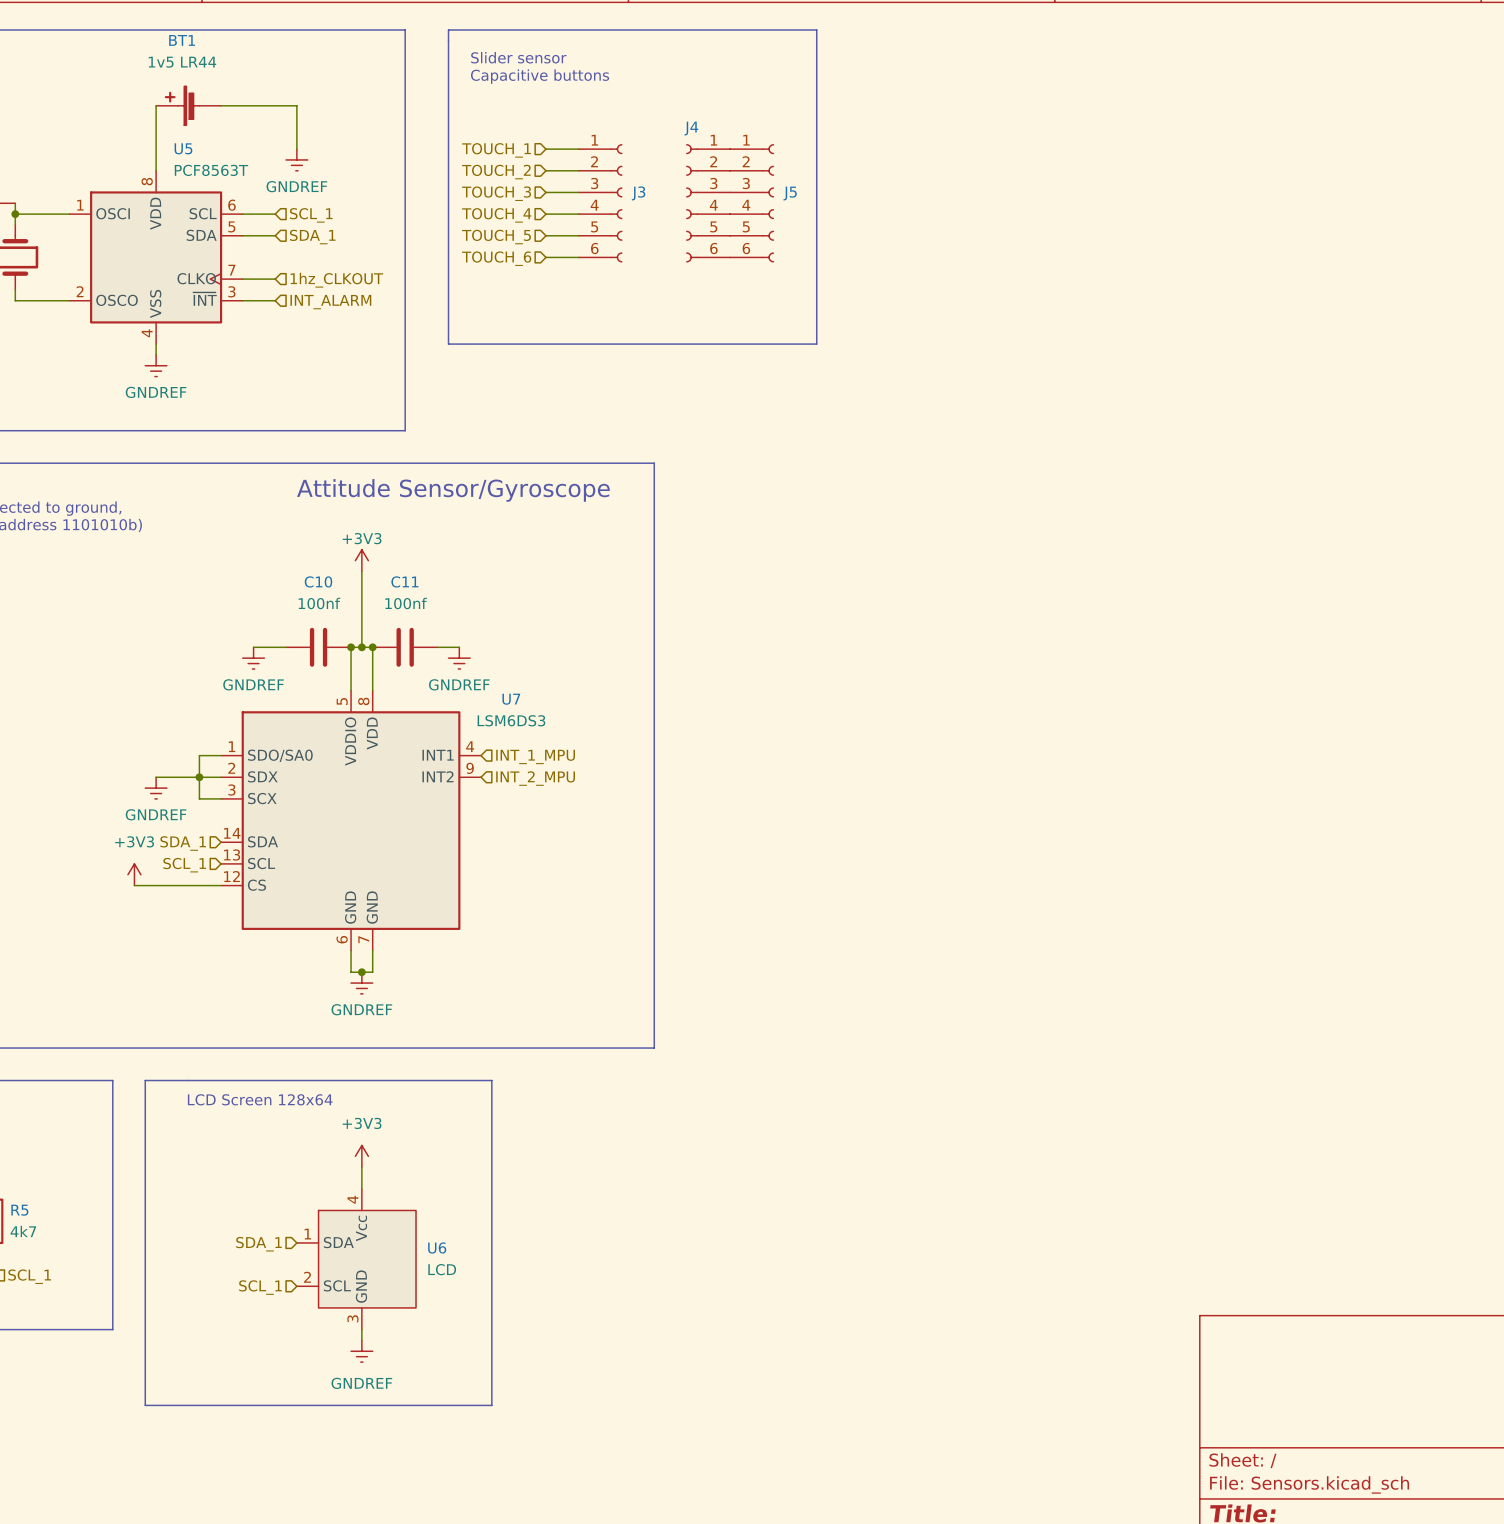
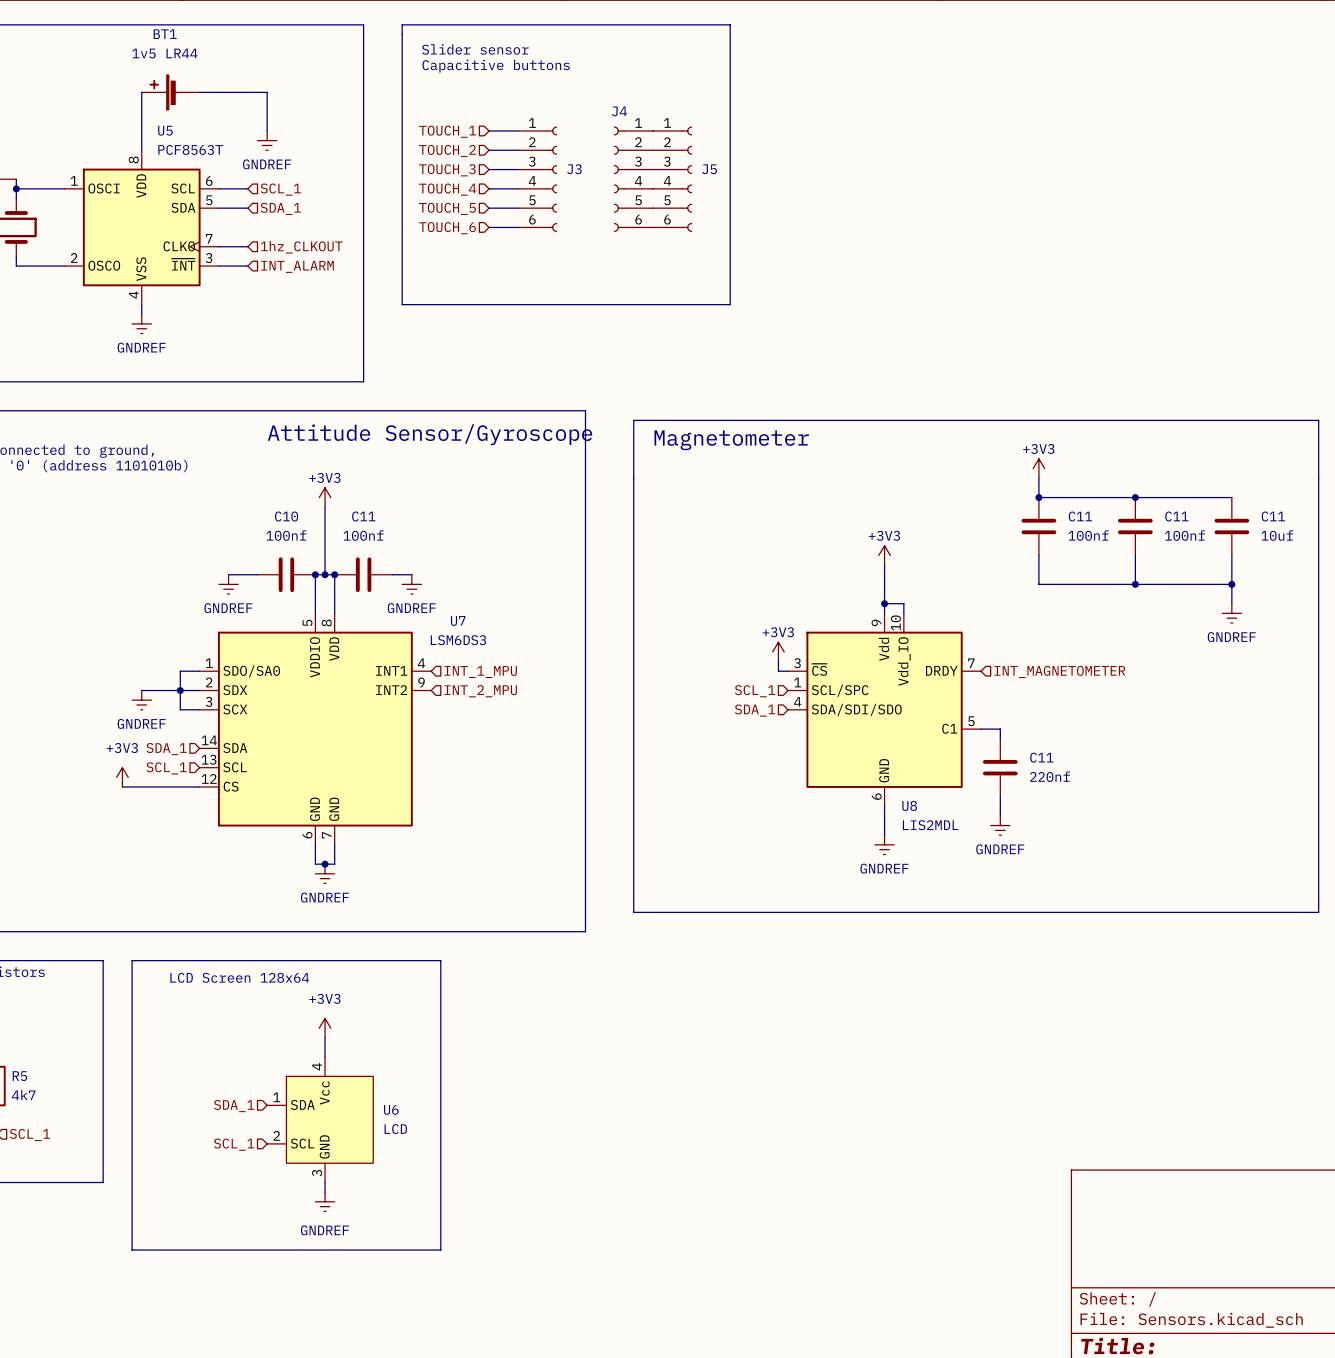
line: none -> (633, 420) (1318, 420) (1318, 912) (633, 912) (633, 420)
text: none -> Magnetometer (731, 440)
power symbol: none -> +3V3 (1038, 468)
wire: none -> (1038, 478) (1038, 497) (1231, 497)
junction: none -> (1038, 497)
junction: none -> (1135, 497)
C11: none -> 100nf (1038, 526)
C11: none -> 100nf (1135, 526)
C11: none -> 10uf (1231, 526)
power symbol: none -> +3V3 (884, 555)
wire: none -> (1038, 555) (1038, 584) (1231, 584)
wire: none -> (1135, 555) (1135, 584)
wire: none -> (1231, 555) (1231, 603)
wire: none -> (884, 565) (884, 613)
junction: none -> (1135, 584)
junction: none -> (1231, 584)
wire: none -> (884, 603) (903, 603) (903, 613)
junction: none -> (884, 603)
power symbol: none -> GNDREF (1231, 613)
power symbol: none -> +3V3 (778, 651)
wire: none -> (778, 661) (778, 671) (788, 671)
hierarchical label: none -> INT_MAGNETOMETER (1059, 671)
hierarchical label: none -> SCL_1 (755, 691)
U8: none -> LIS2MDL (884, 709)
hierarchical label: none -> SDA_1 (755, 710)
wire: none -> (981, 729) (1000, 729) (1000, 738)
C11: none -> 220nf (1000, 767)
wire: none -> (1000, 796) (1000, 815)
wire: none -> (884, 806) (884, 835)
power symbol: none -> GNDREF (1000, 825)
power symbol: none -> GNDREF (884, 844)

